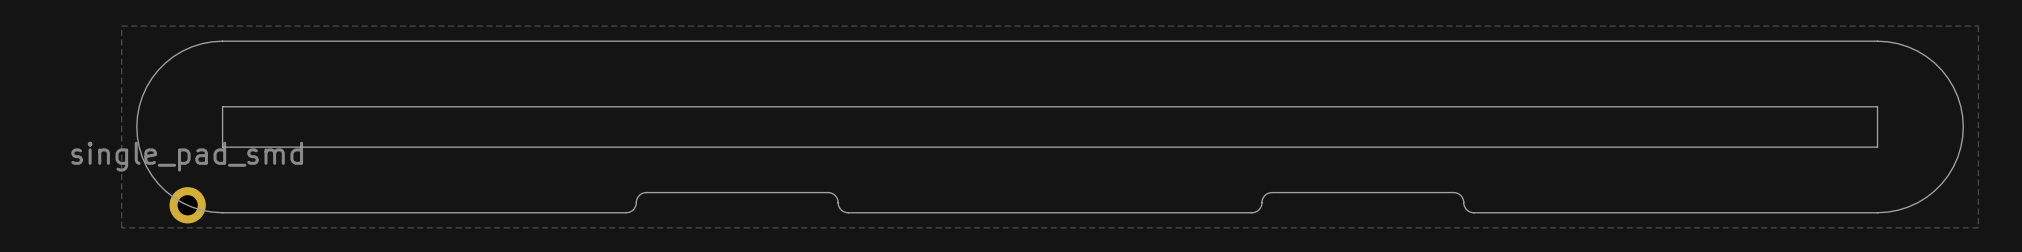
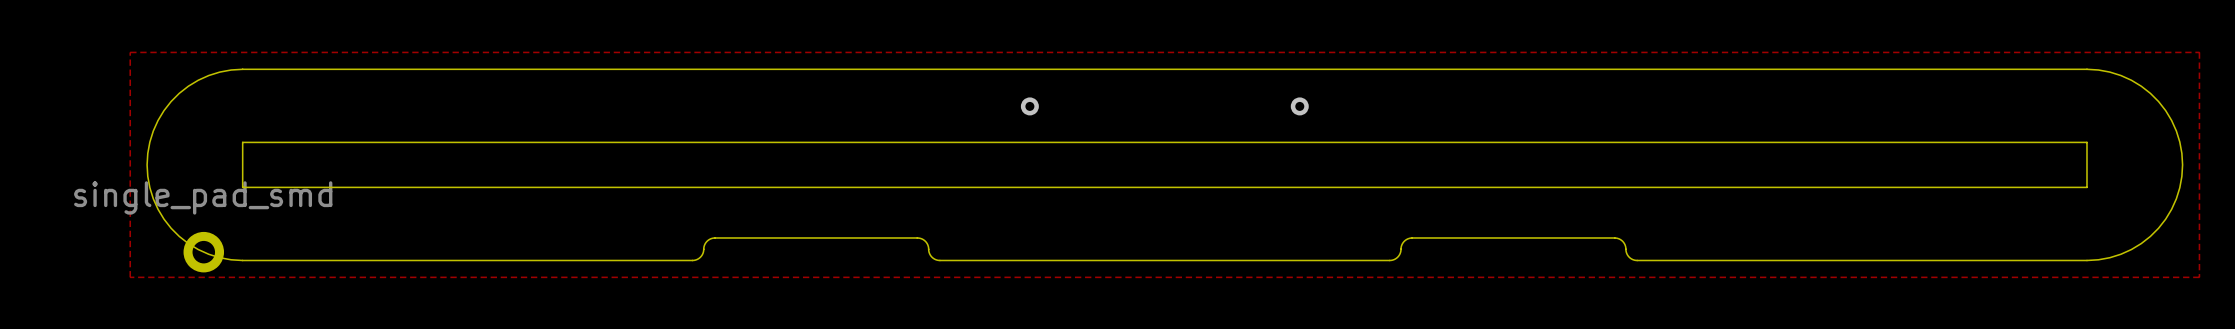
via: none -> (1029, 106)
via: none -> (1299, 106)

